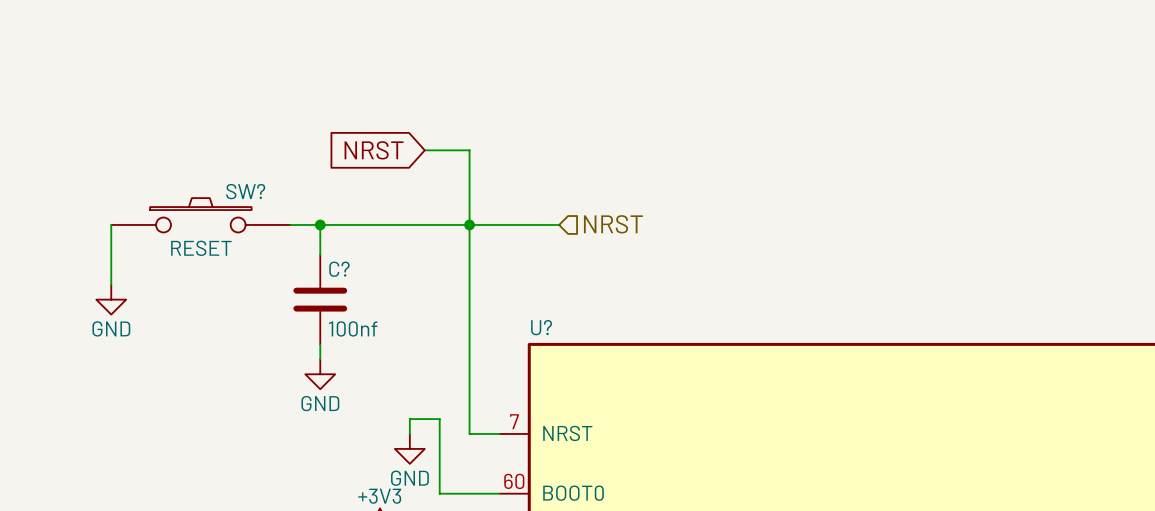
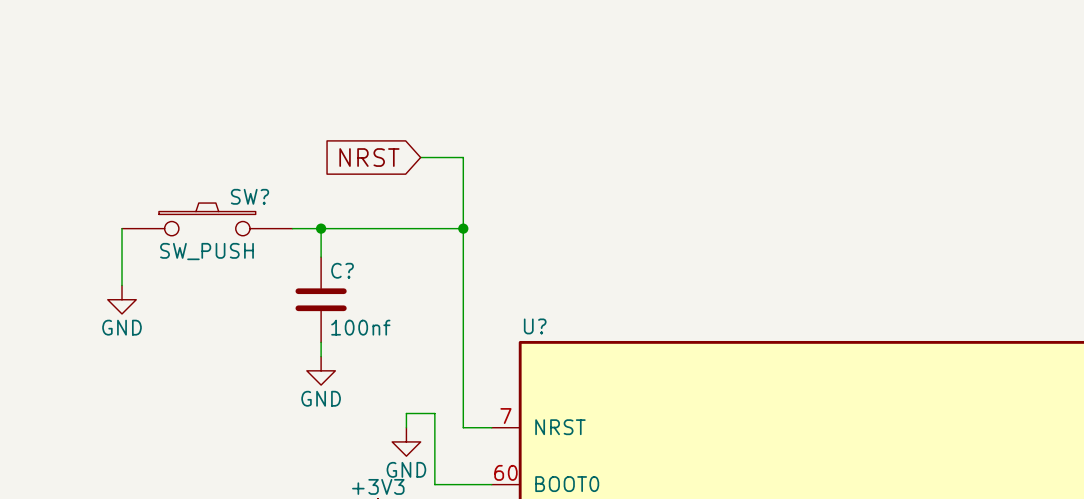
wire: (469, 224) (559, 224) -> none
hierarchical label: NRST (613, 224) -> none
SW? value: RESET (201, 248) -> SW_PUSH (206, 251)

